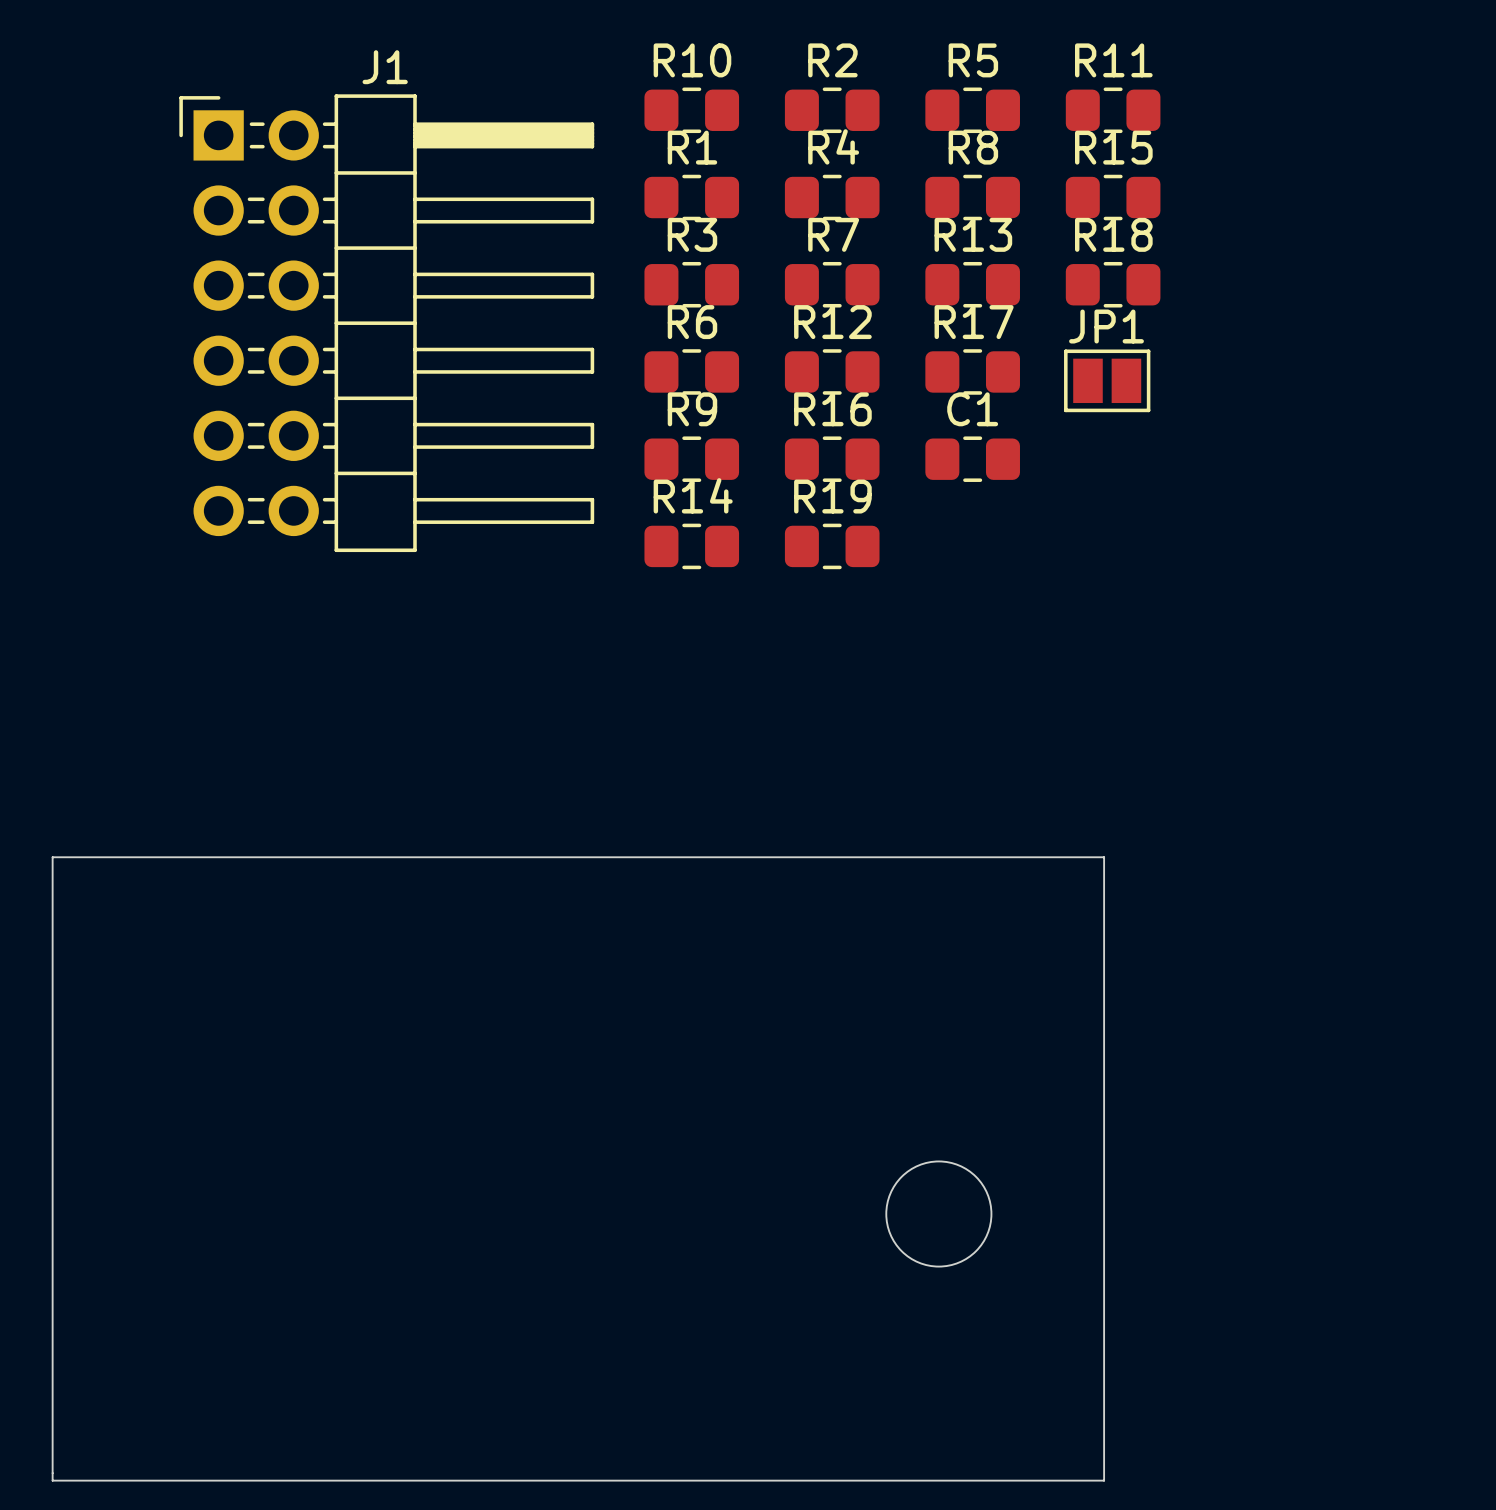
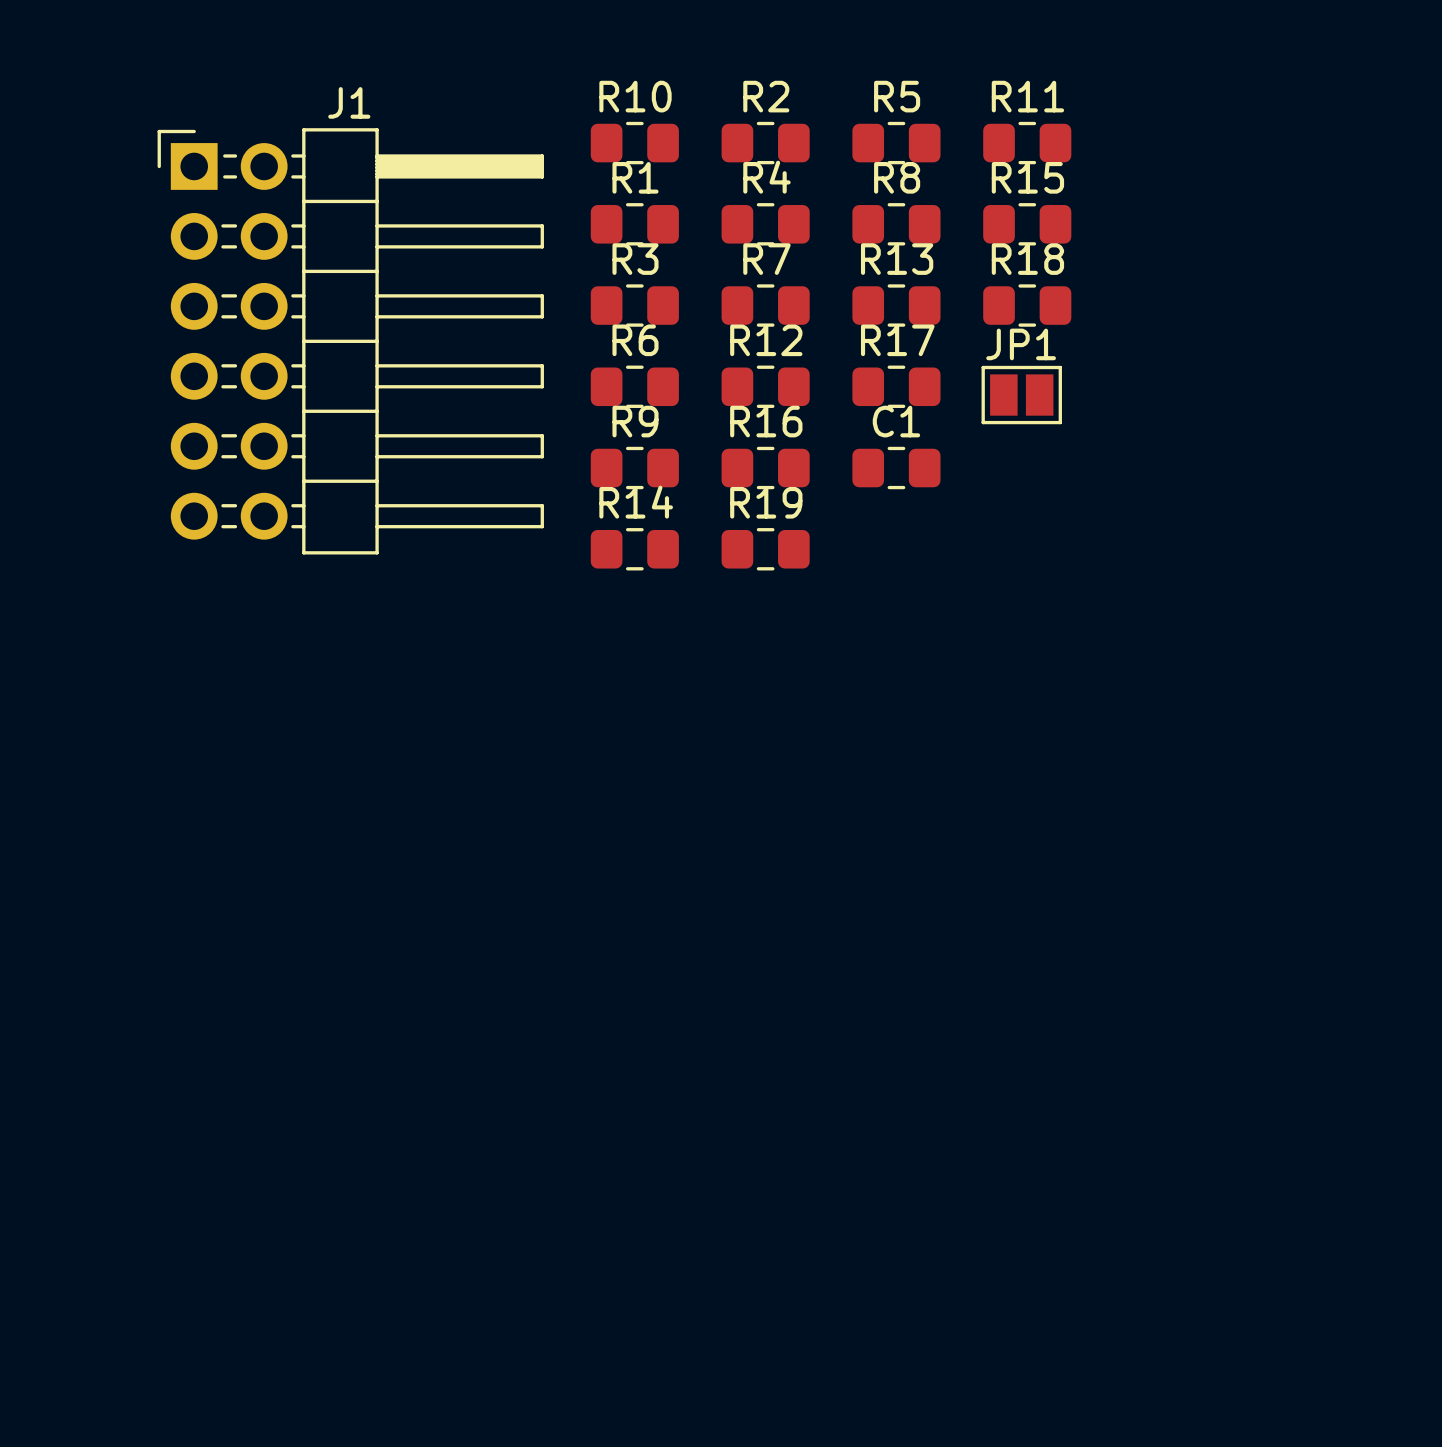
board edge: (52, 857) (52, 1480) (1104, 1480) (1104, 857) (52, 857) -> none
round board edge: [885, 1160, 993, 1268] -> none

